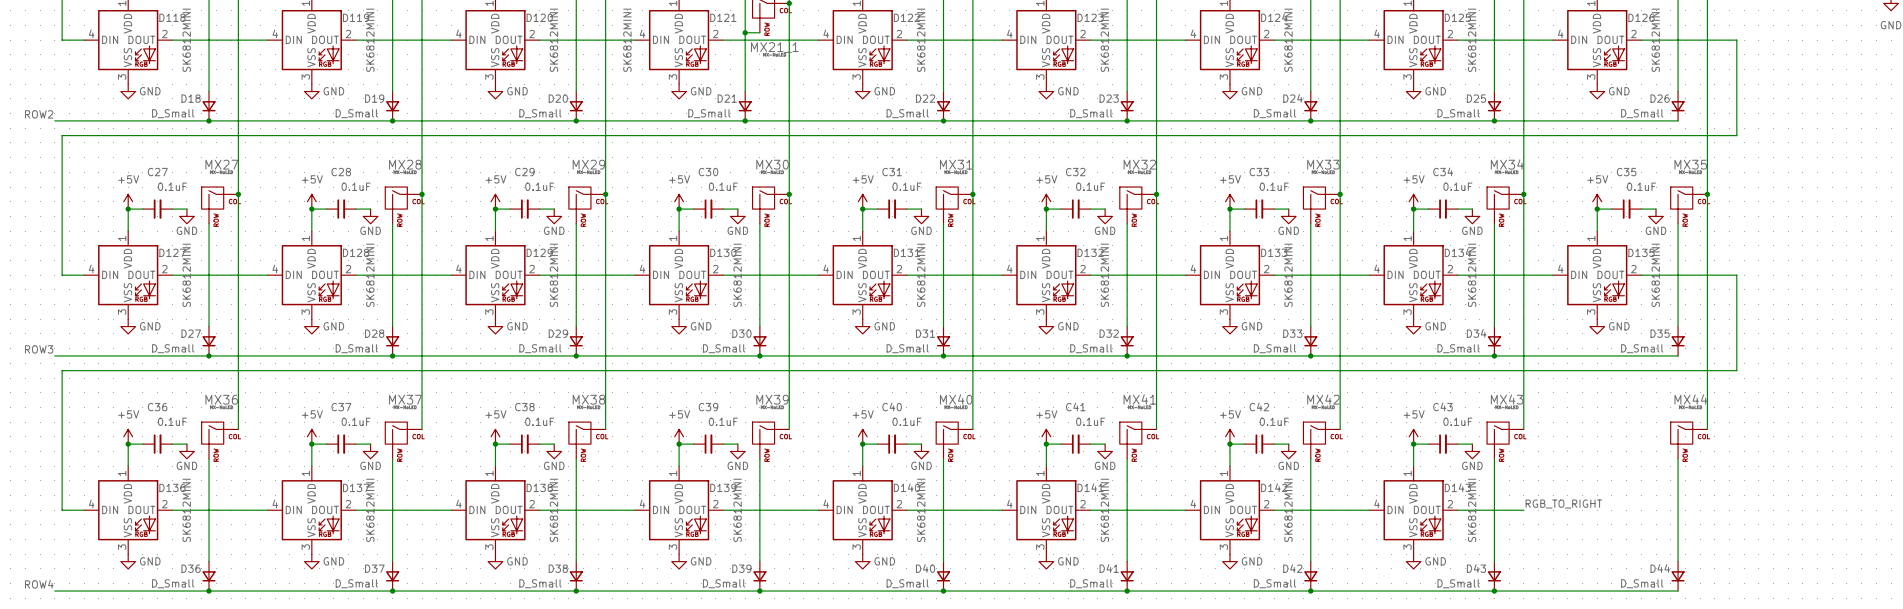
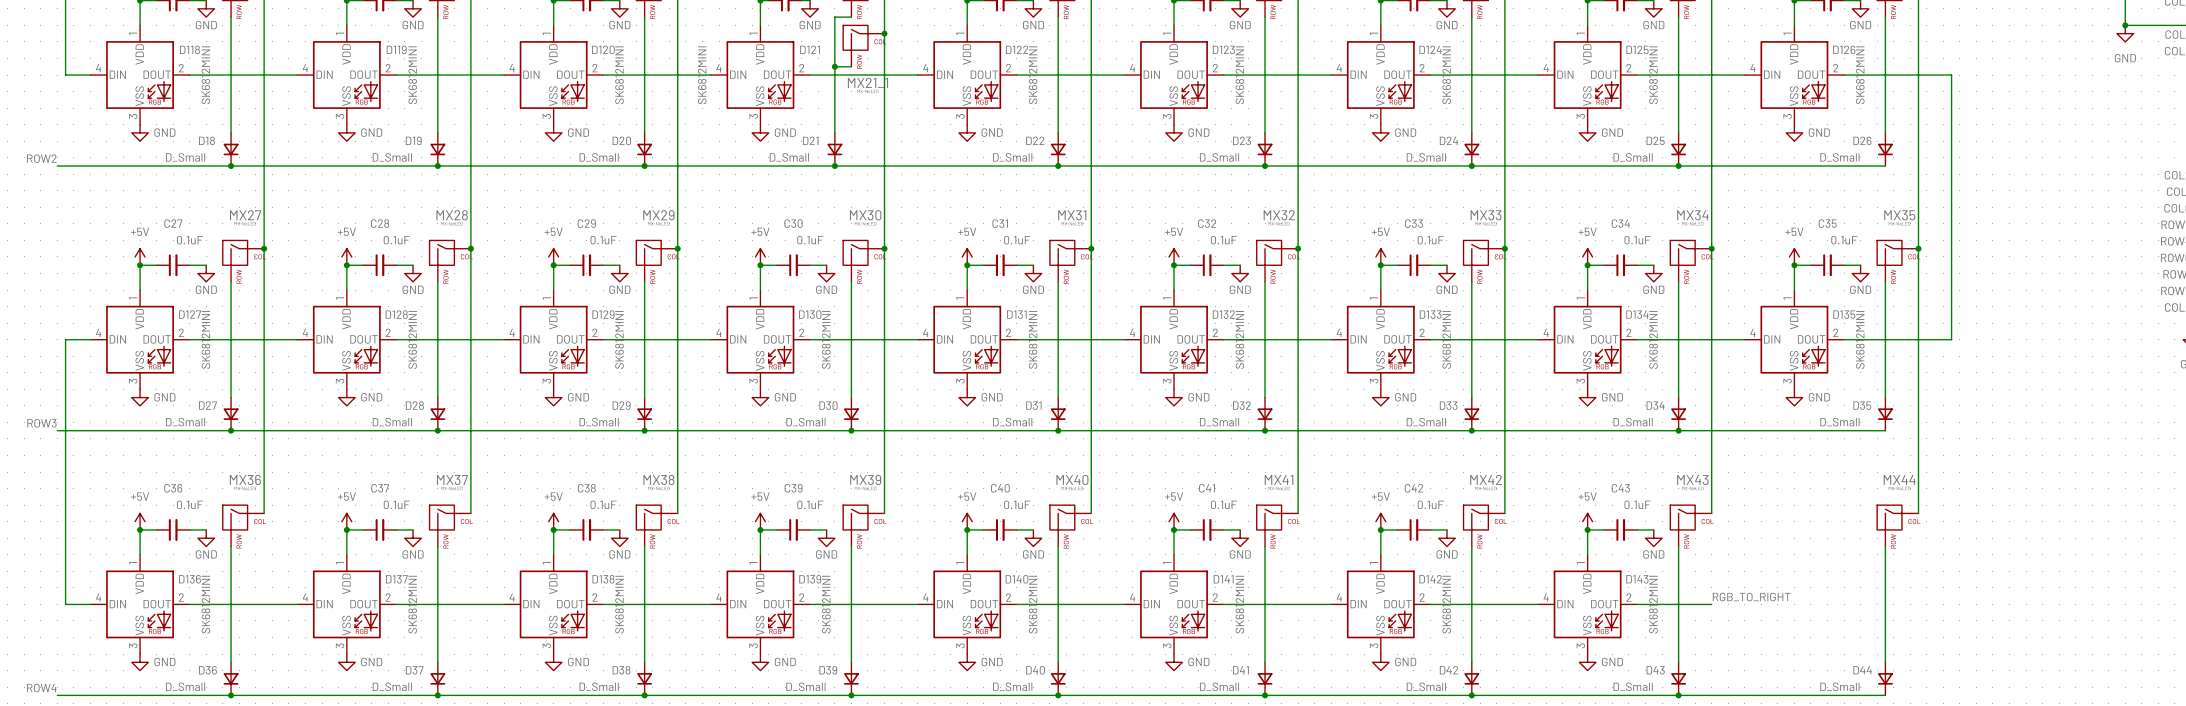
wire: (1736, 135) (62, 135) (62, 275) -> (1951, 182) (1951, 339)
wire: (1736, 275) (1736, 370) (62, 370) -> (65, 339) (65, 447)

